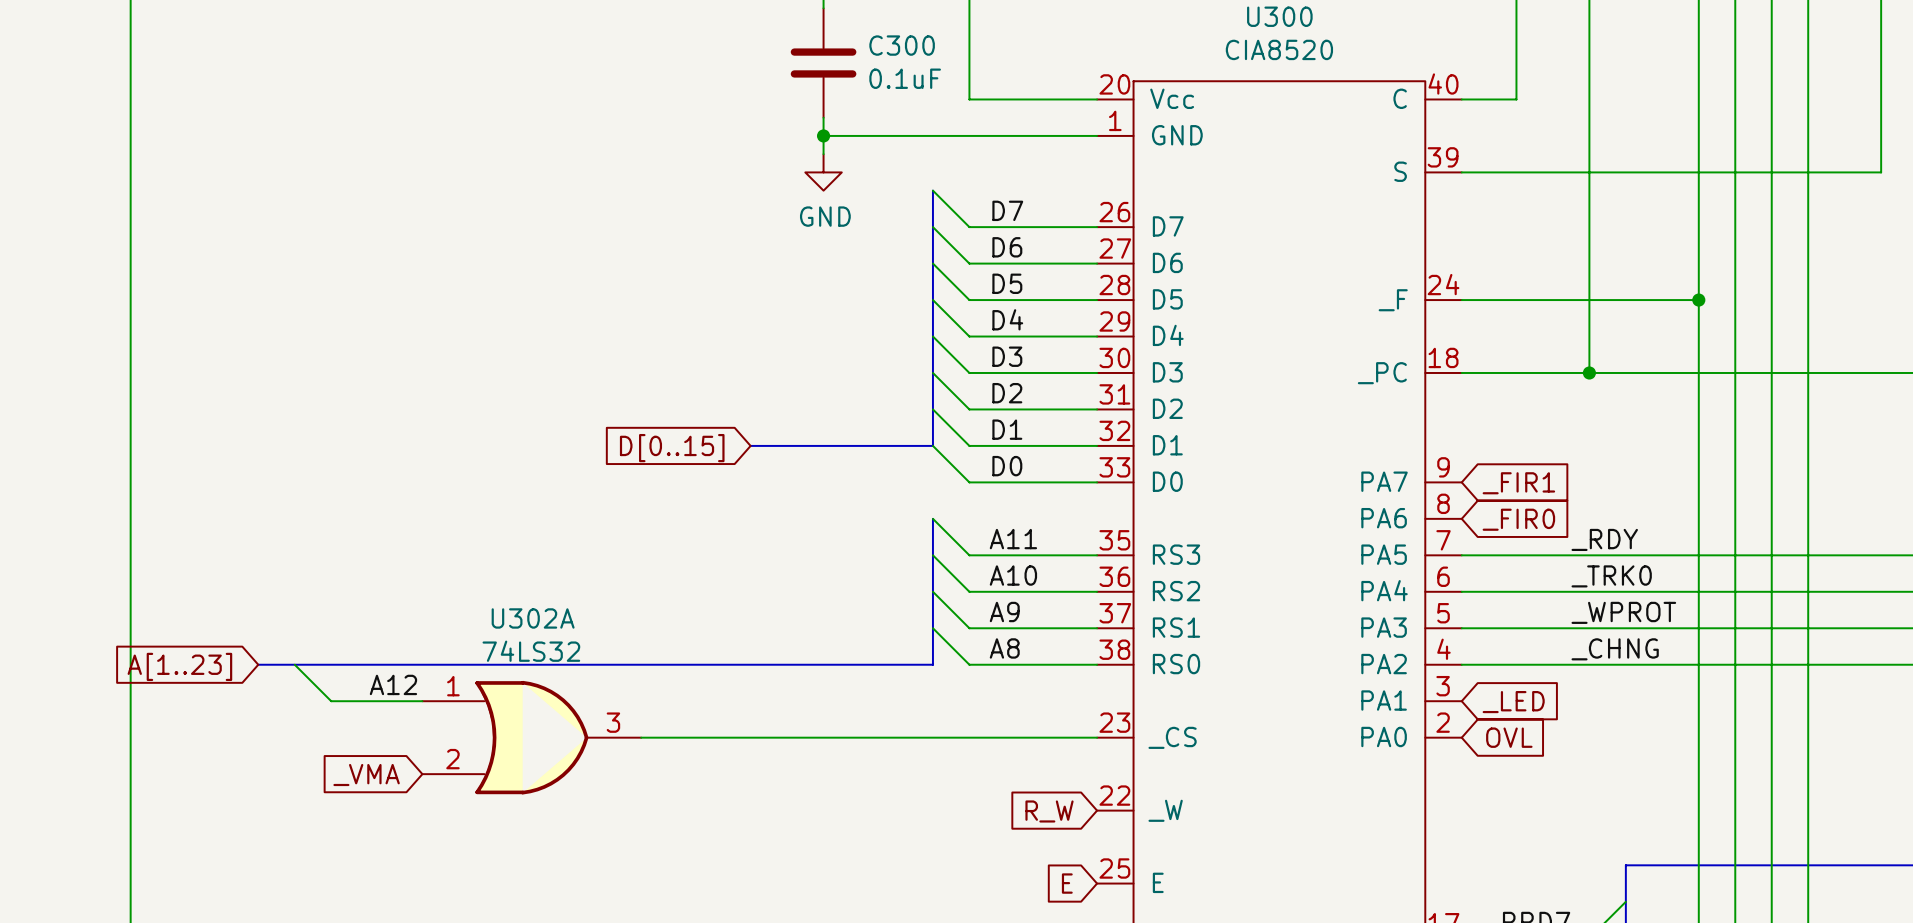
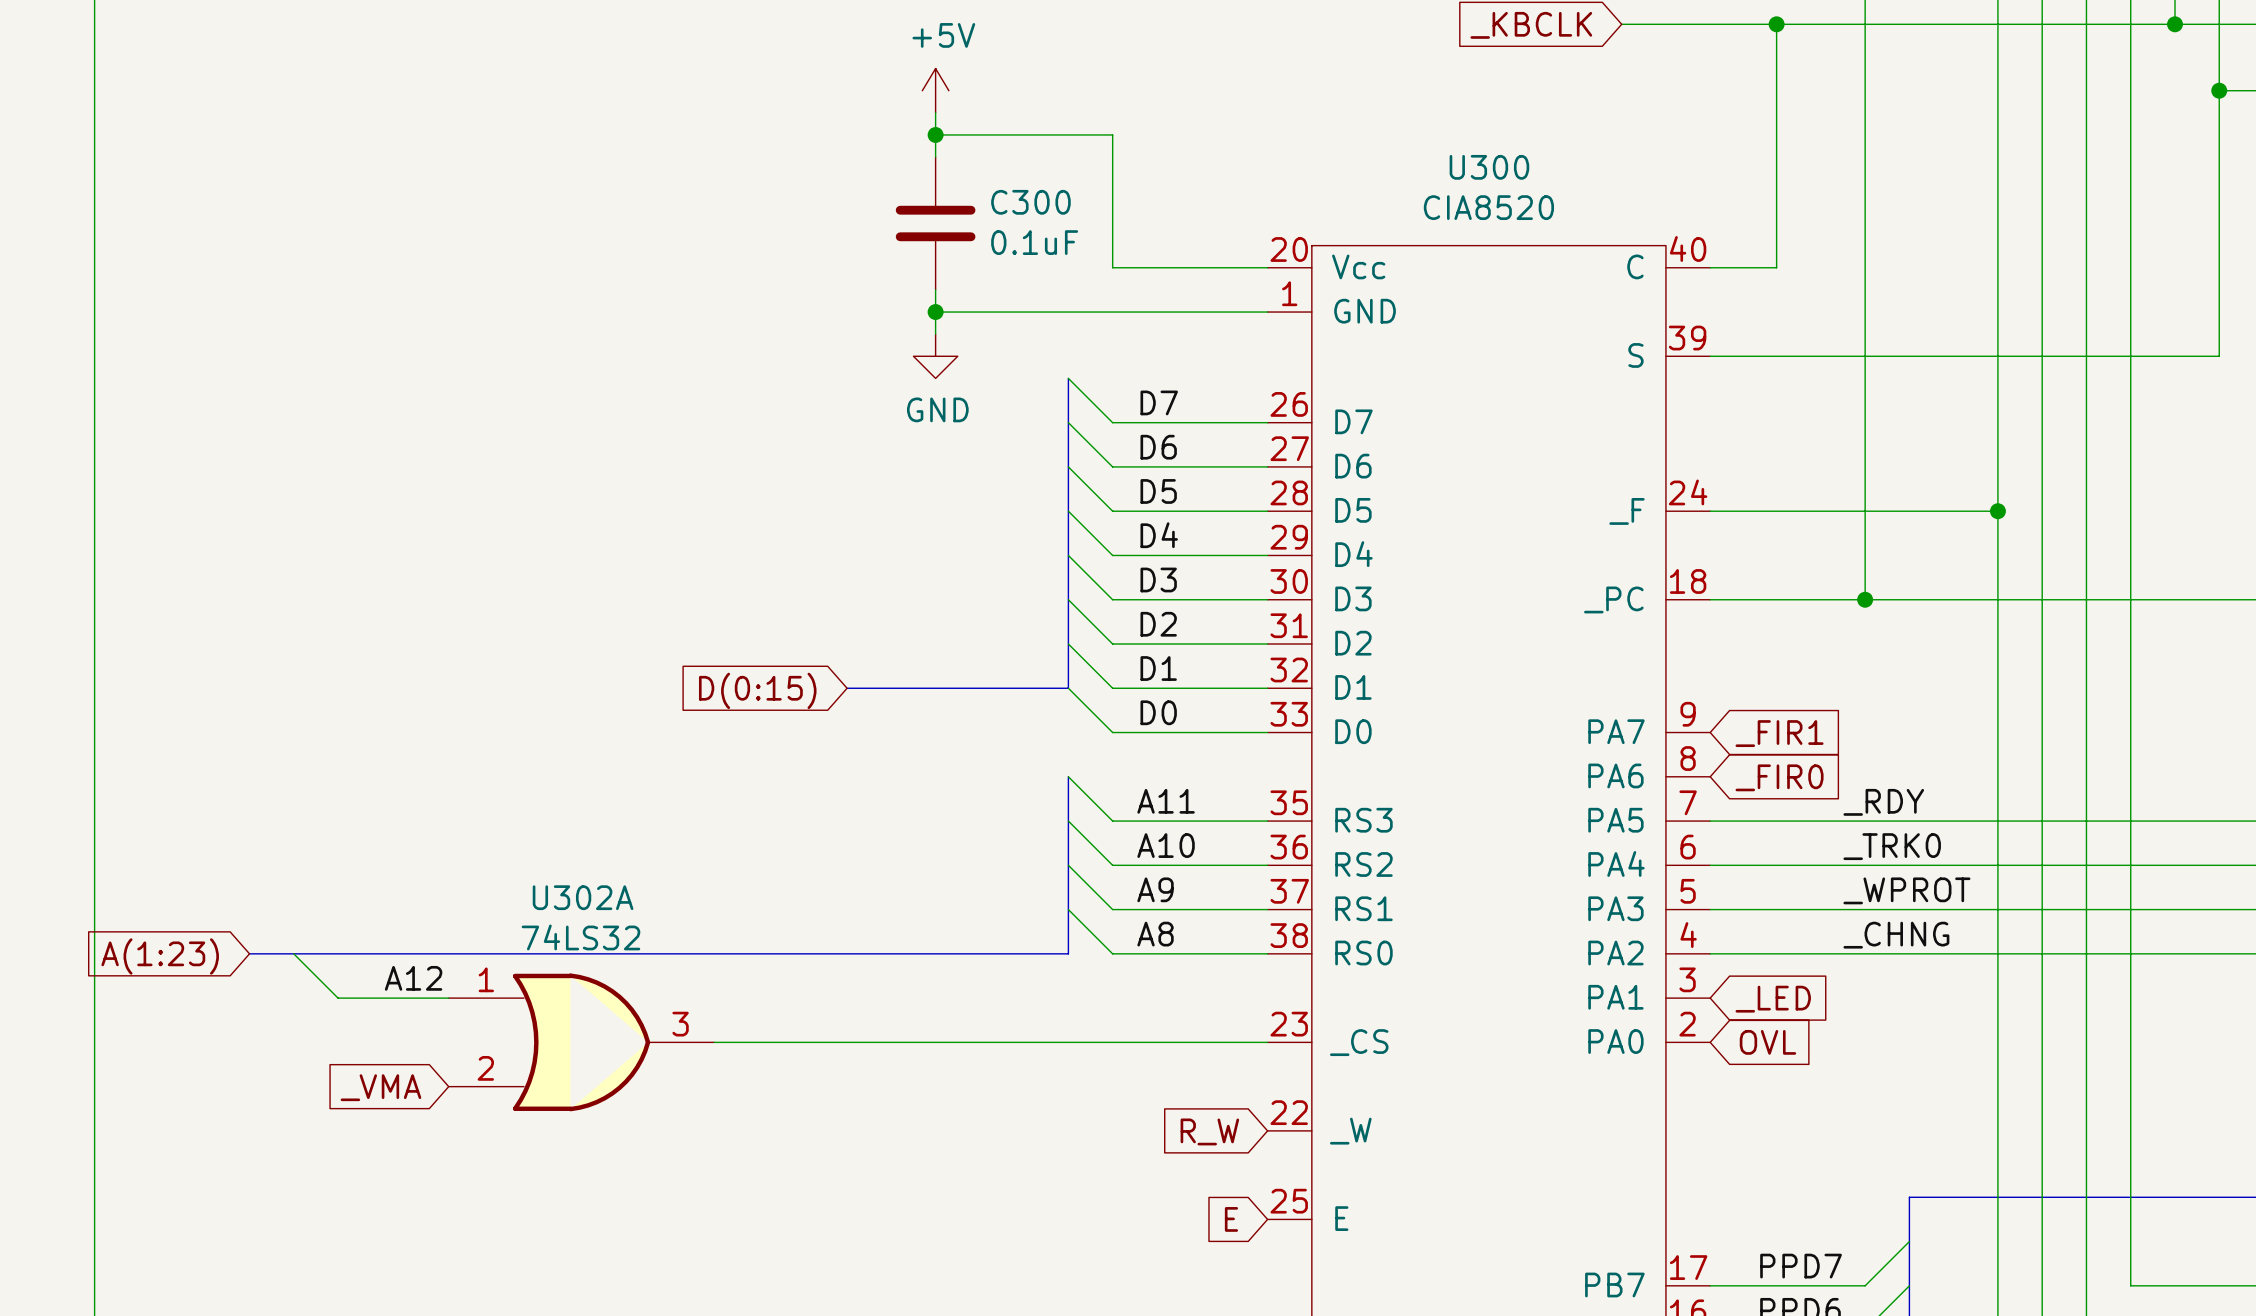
global label: D[0..15] (672, 448) -> D(0:15) (757, 690)
global label: A[1..23] (179, 666) -> A(1:23) (160, 956)

